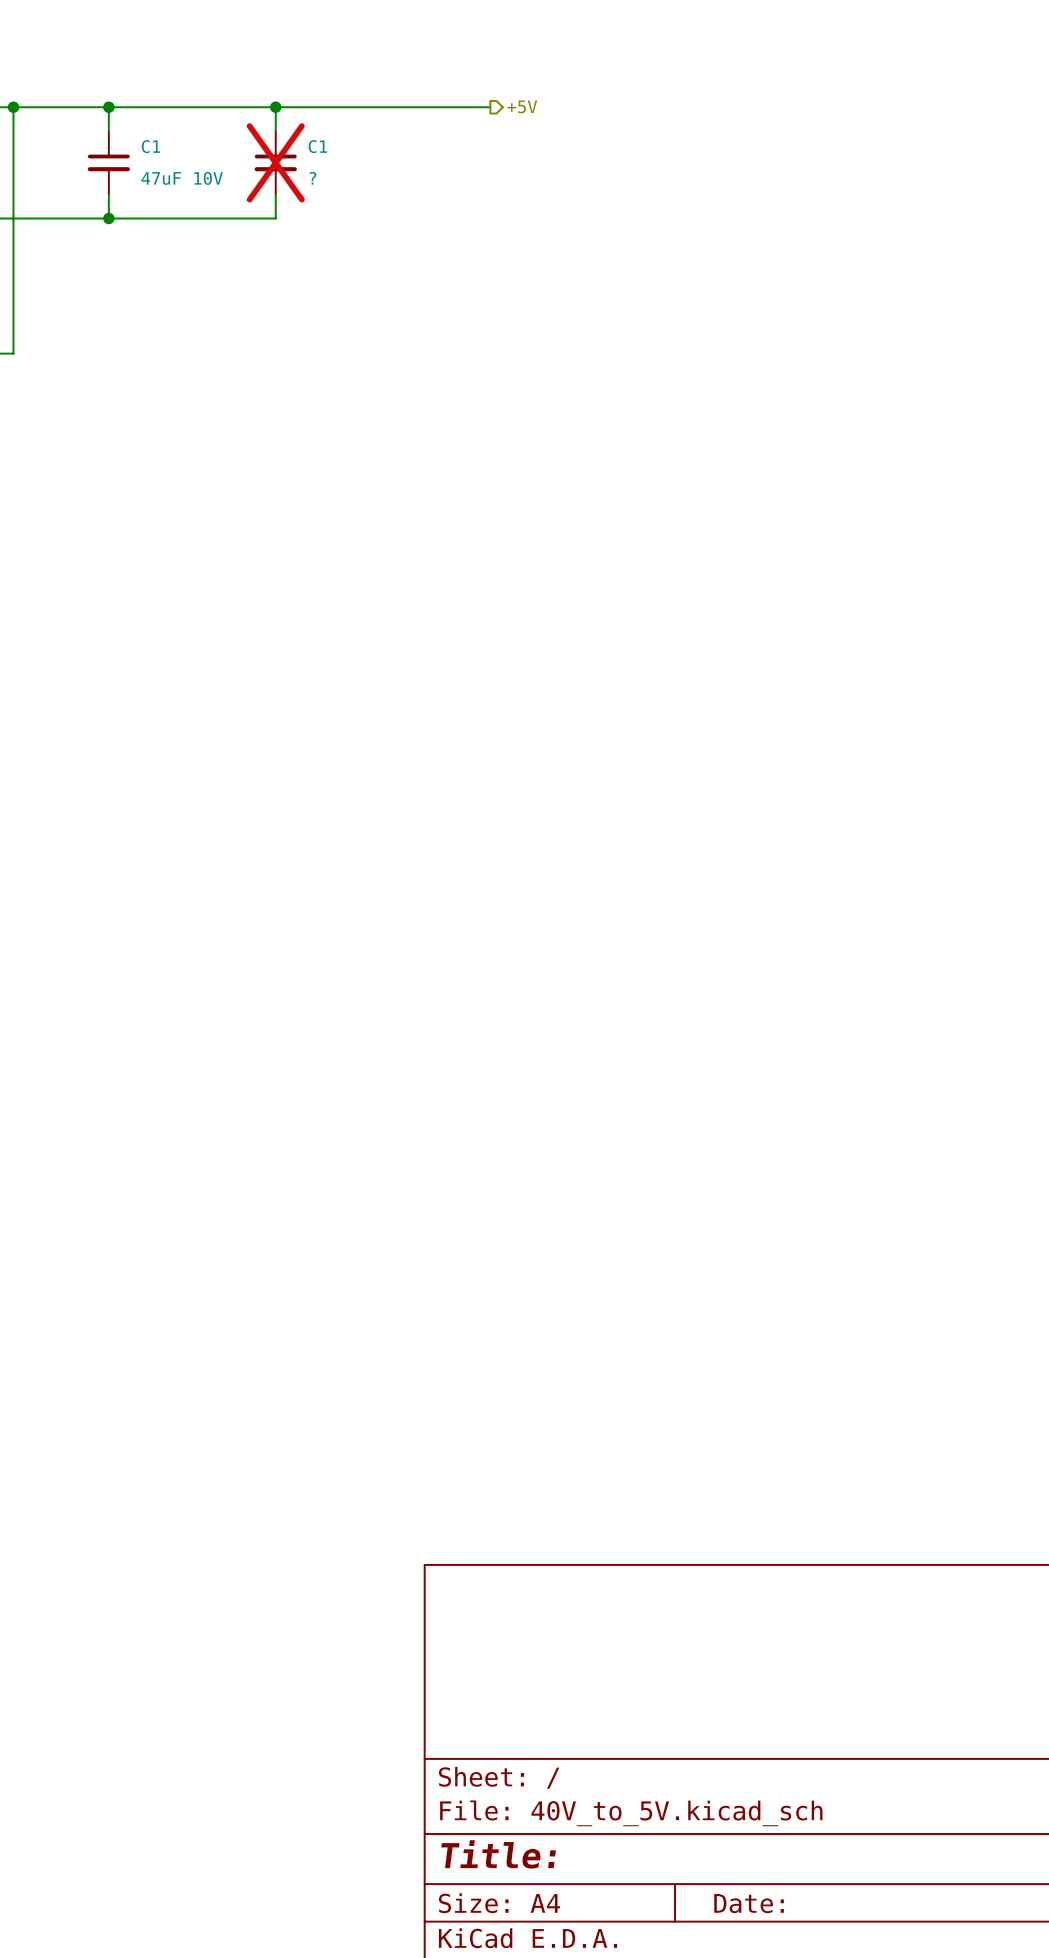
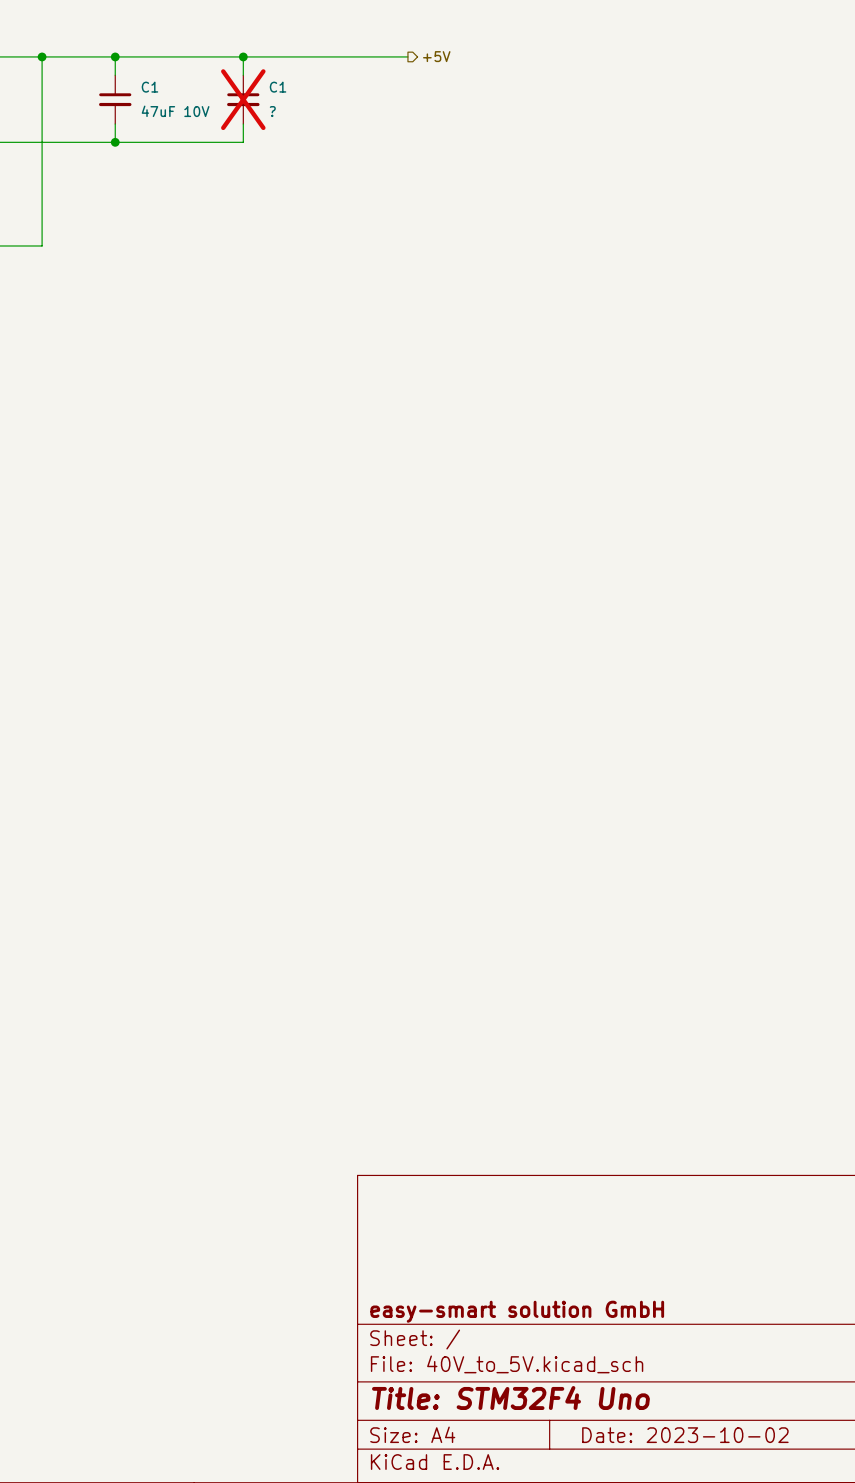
title block: none -> easy-smart solution GmbH (517, 1311)
title block: Title: (498, 1854) -> Title: STM32F4 Uno (510, 1398)
title block: Date: (749, 1903) -> Date: 2023-10-02 (685, 1435)

